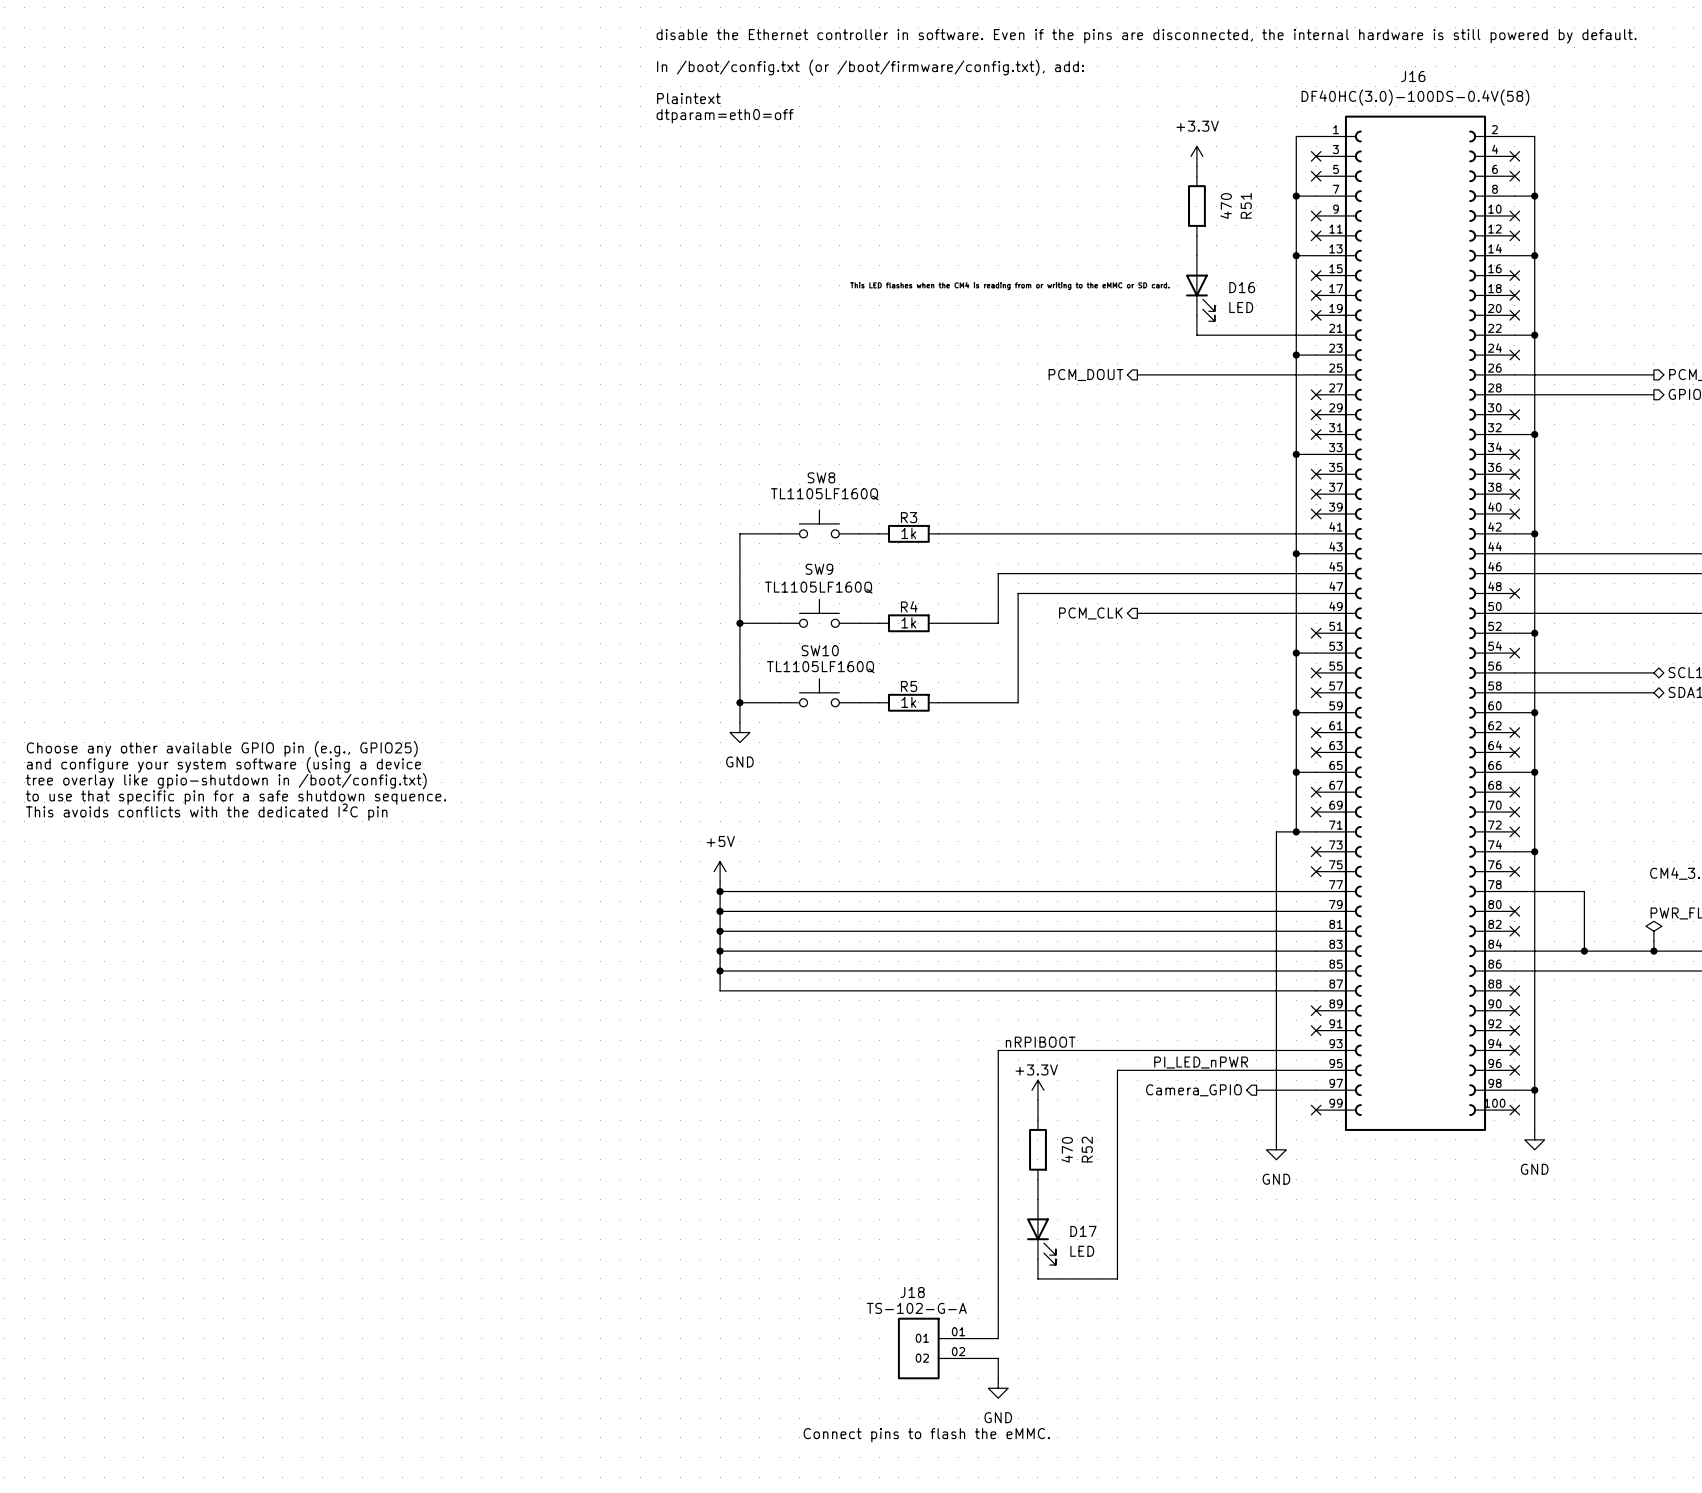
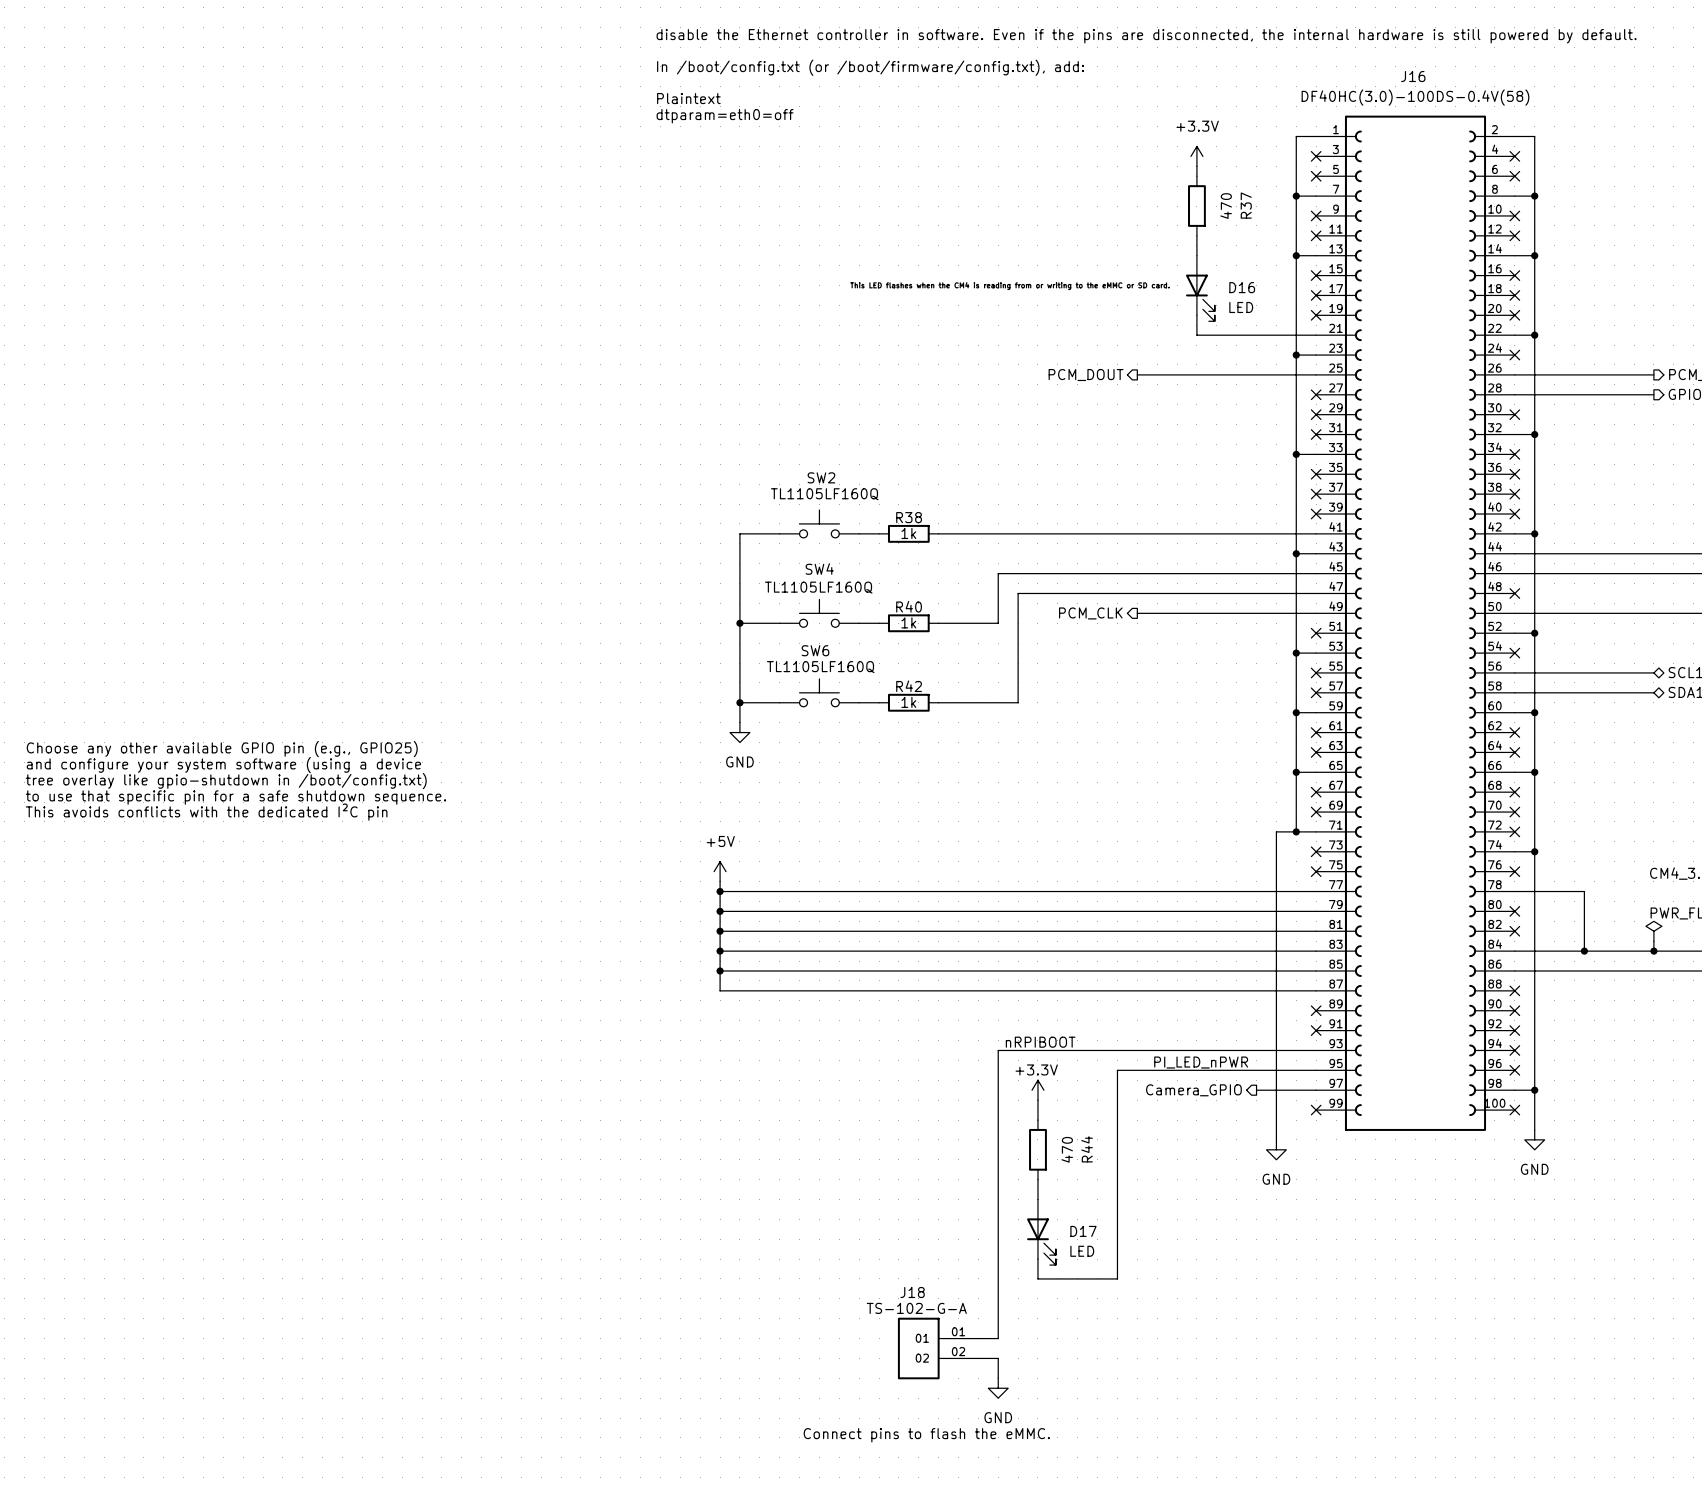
R51 name: R51 (1246, 205) -> R37 (1246, 205)
SW8 name: SW8 (821, 477) -> SW2 (821, 477)
R3 name: R3 (909, 517) -> R38 (909, 517)
SW9 name: SW9 (819, 569) -> SW4 (819, 569)
R4 name: R4 (909, 606) -> R40 (909, 606)
SW10 name: SW10 (820, 650) -> SW6 (815, 650)
R5 name: R5 (909, 686) -> R42 (909, 686)
R52 name: R52 (1087, 1149) -> R44 (1087, 1149)

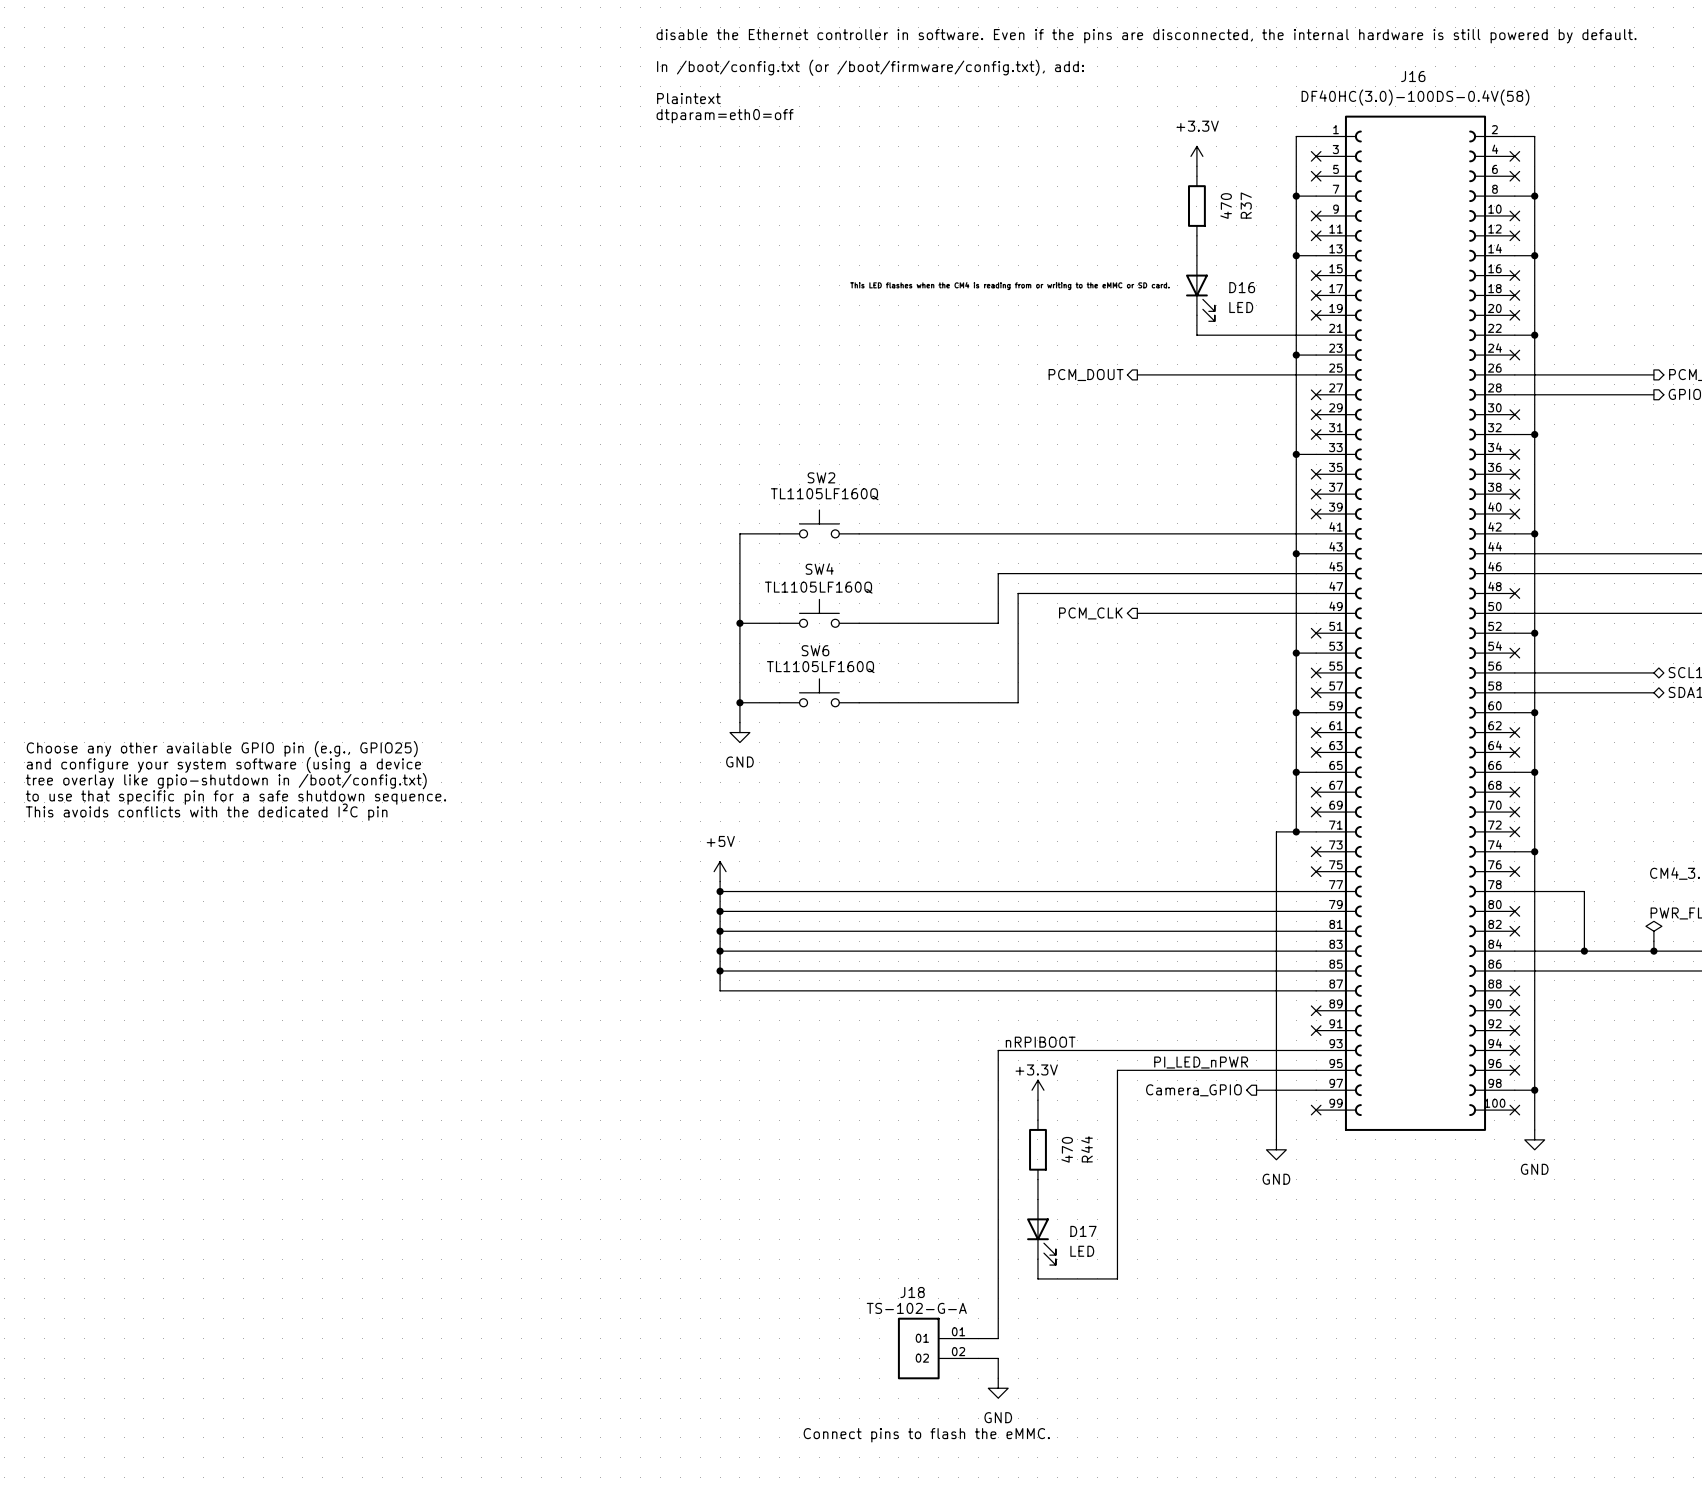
wire: none -> (879, 533) (938, 533)
R38: 1k (908, 533) -> none
wire: none -> (879, 623) (938, 623)
R40: 1k (908, 623) -> none
wire: none -> (879, 702) (938, 702)
R42: 1k (908, 702) -> none

